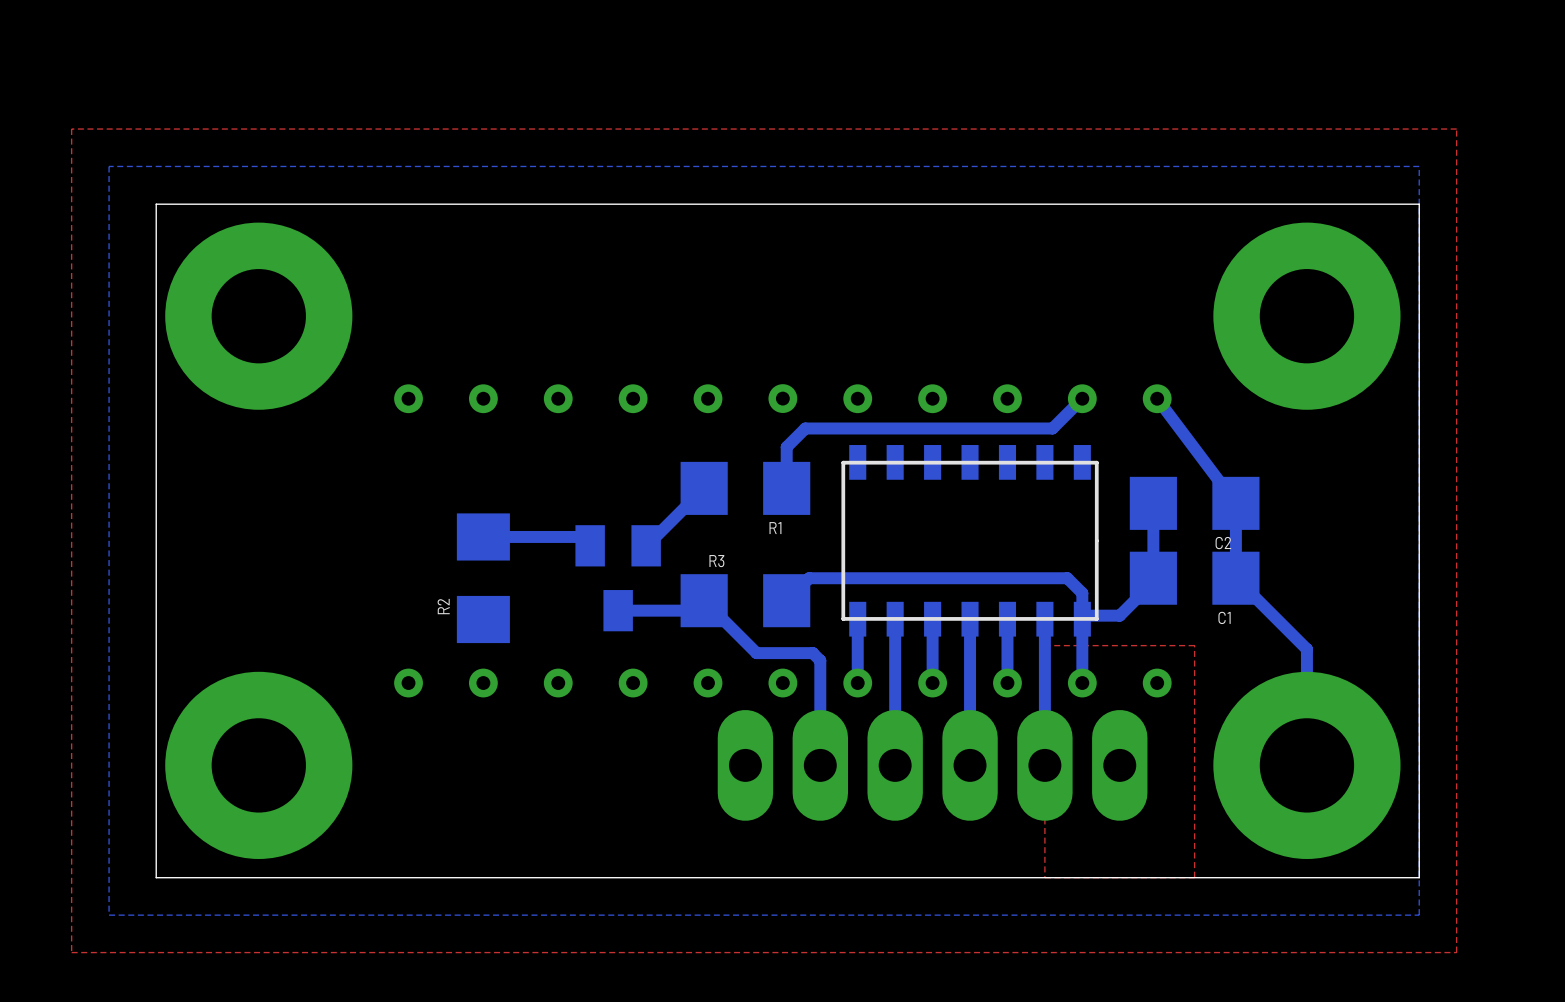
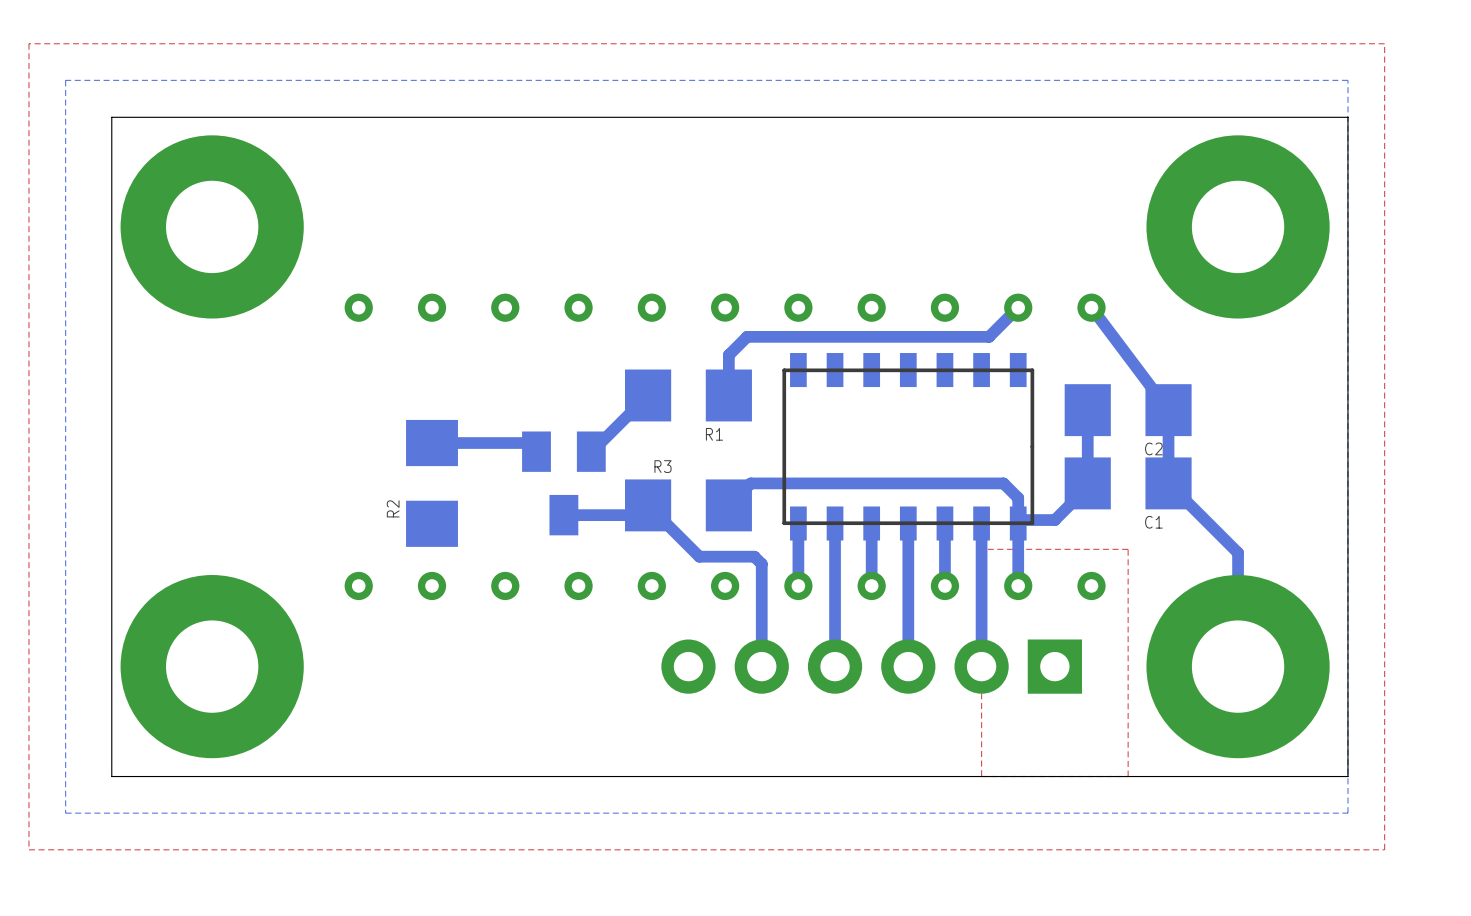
part footprint: [717, 710, 1148, 821] -> [661, 639, 1082, 694]

